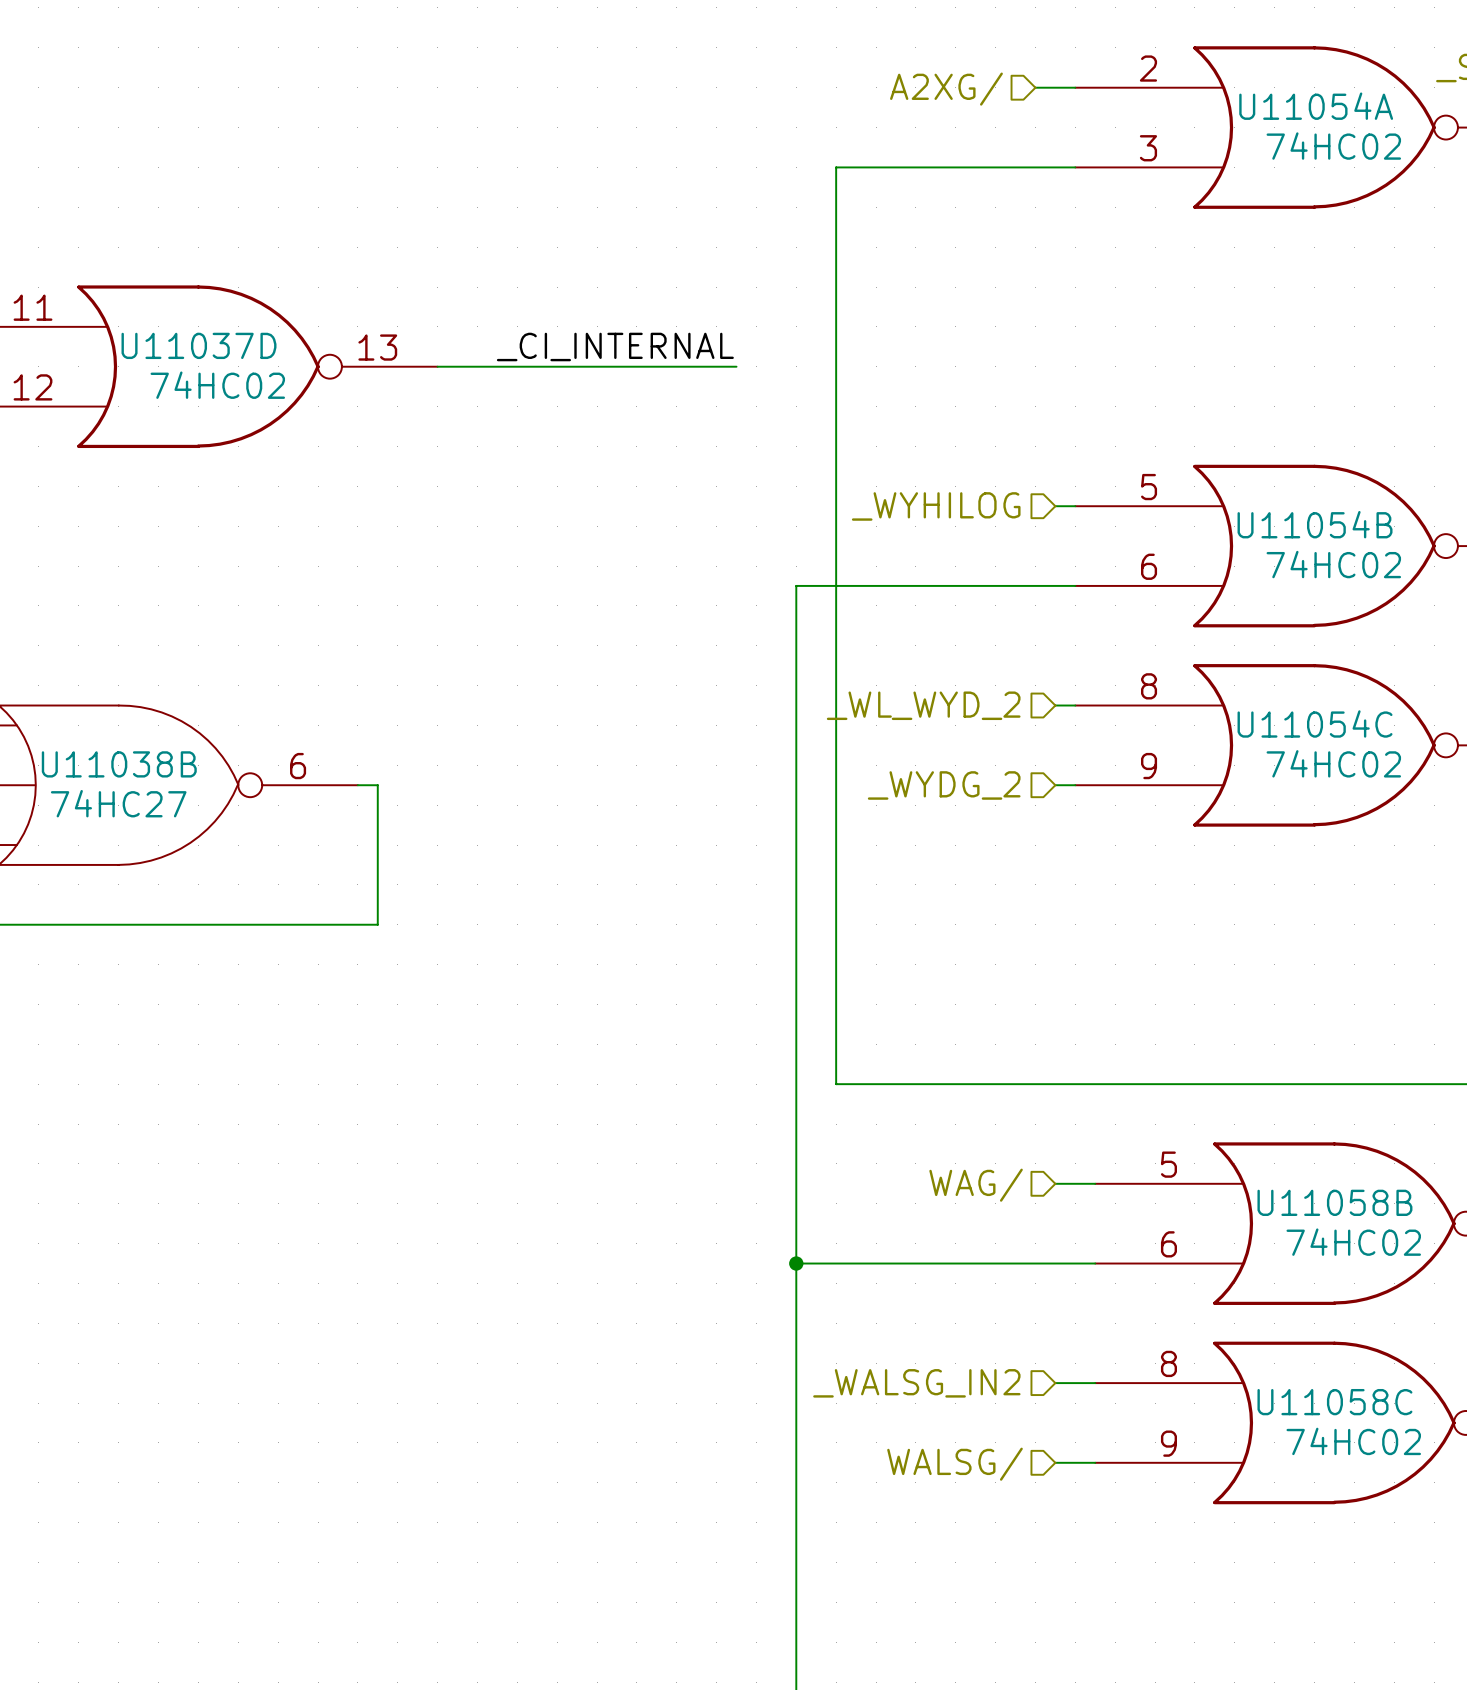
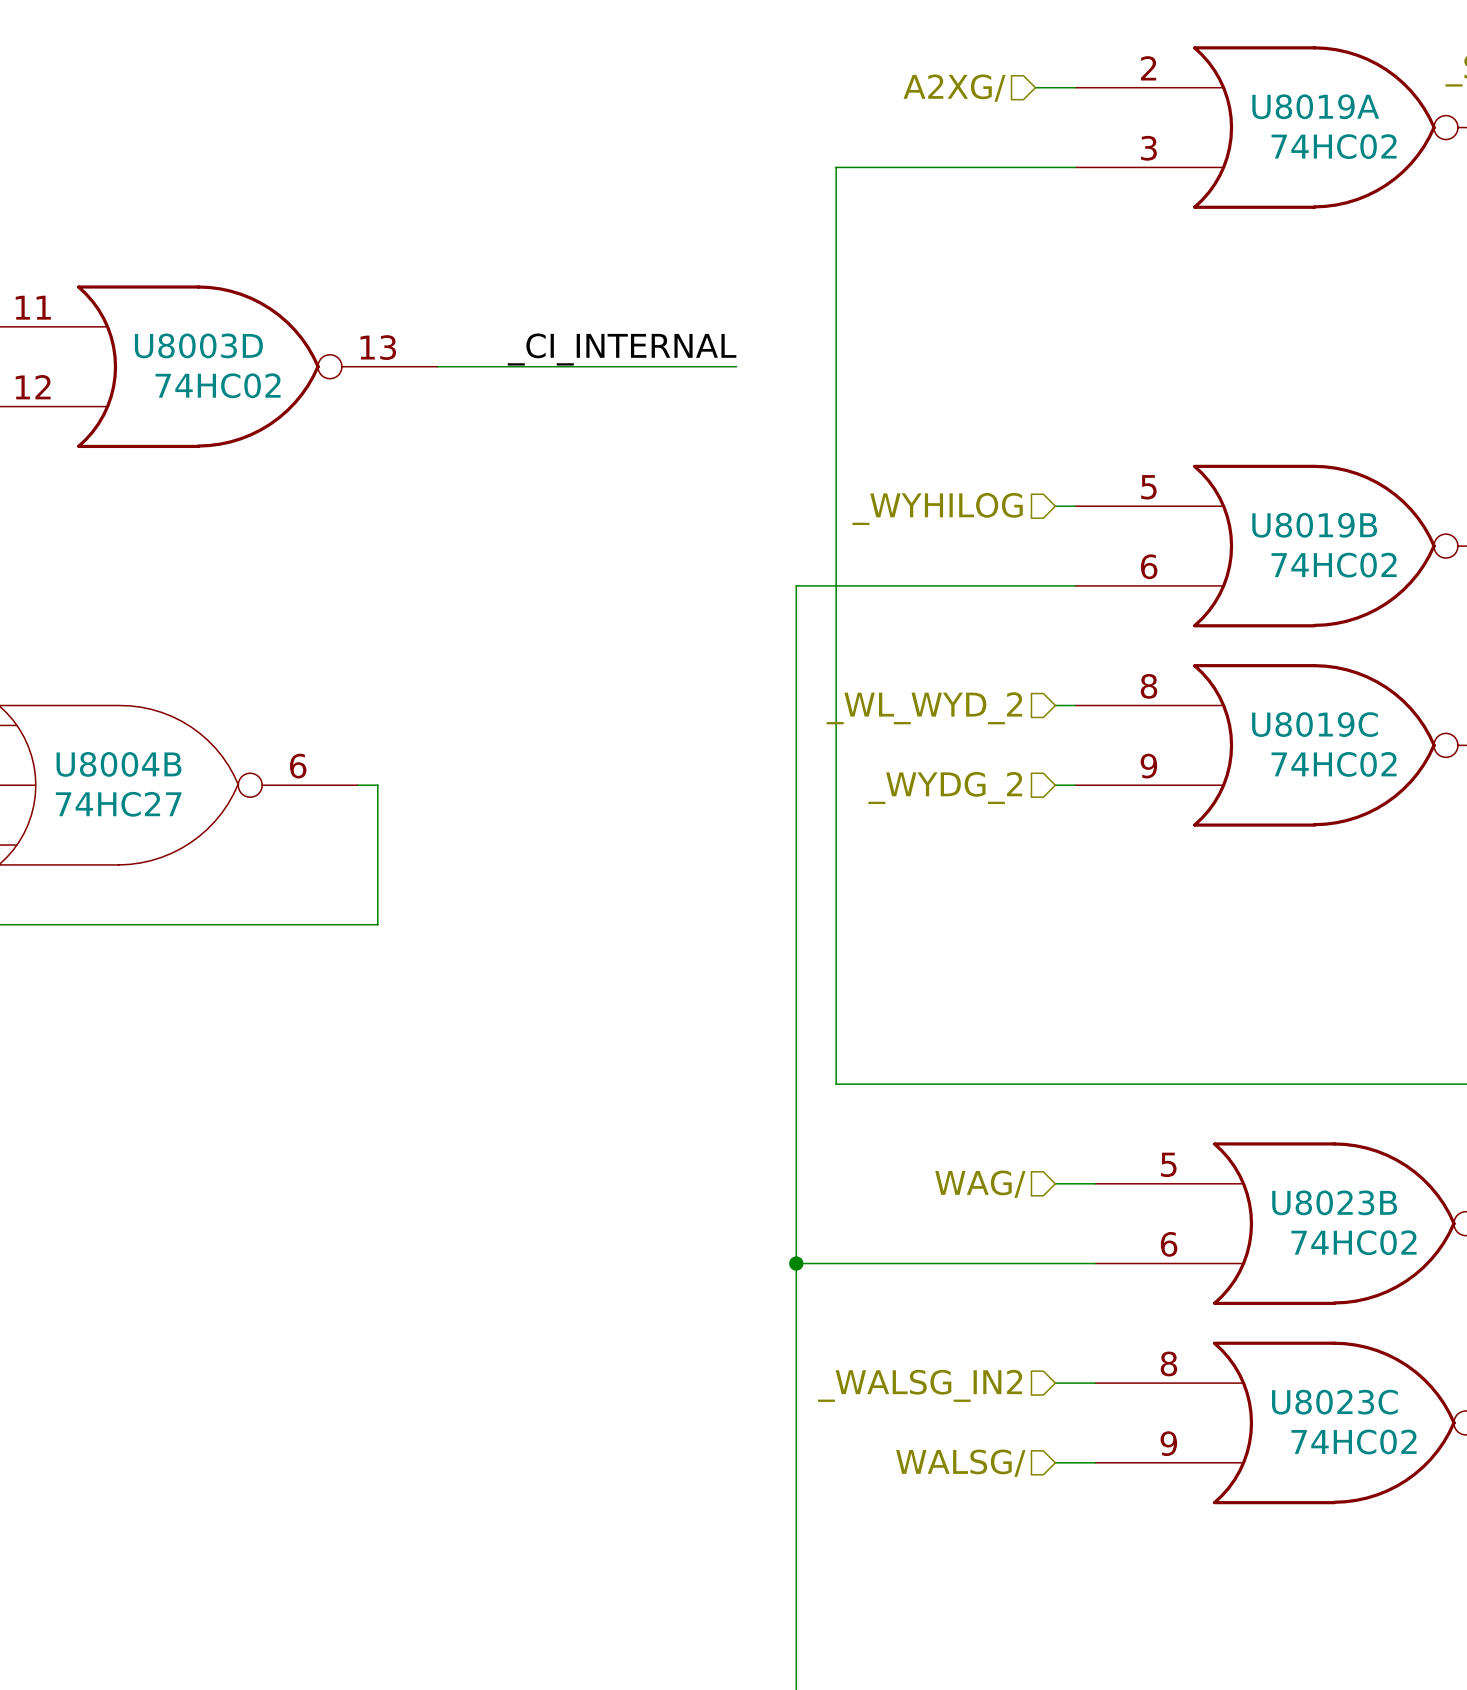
U11054A name: U11054A (1316, 106) -> U8019A (1315, 106)
U11037D name: U11037D (198, 345) -> U8003D (198, 345)
U11054B name: U11054B (1315, 524) -> U8019B (1314, 525)
U11054C name: U11054C (1315, 723) -> U8019C (1314, 724)
U11038B name: U11038B (119, 764) -> U8004B (118, 764)
U11058B name: U11058B (1334, 1202) -> U8023B (1334, 1202)
U11058C name: U11058C (1334, 1402) -> U8023C (1334, 1402)

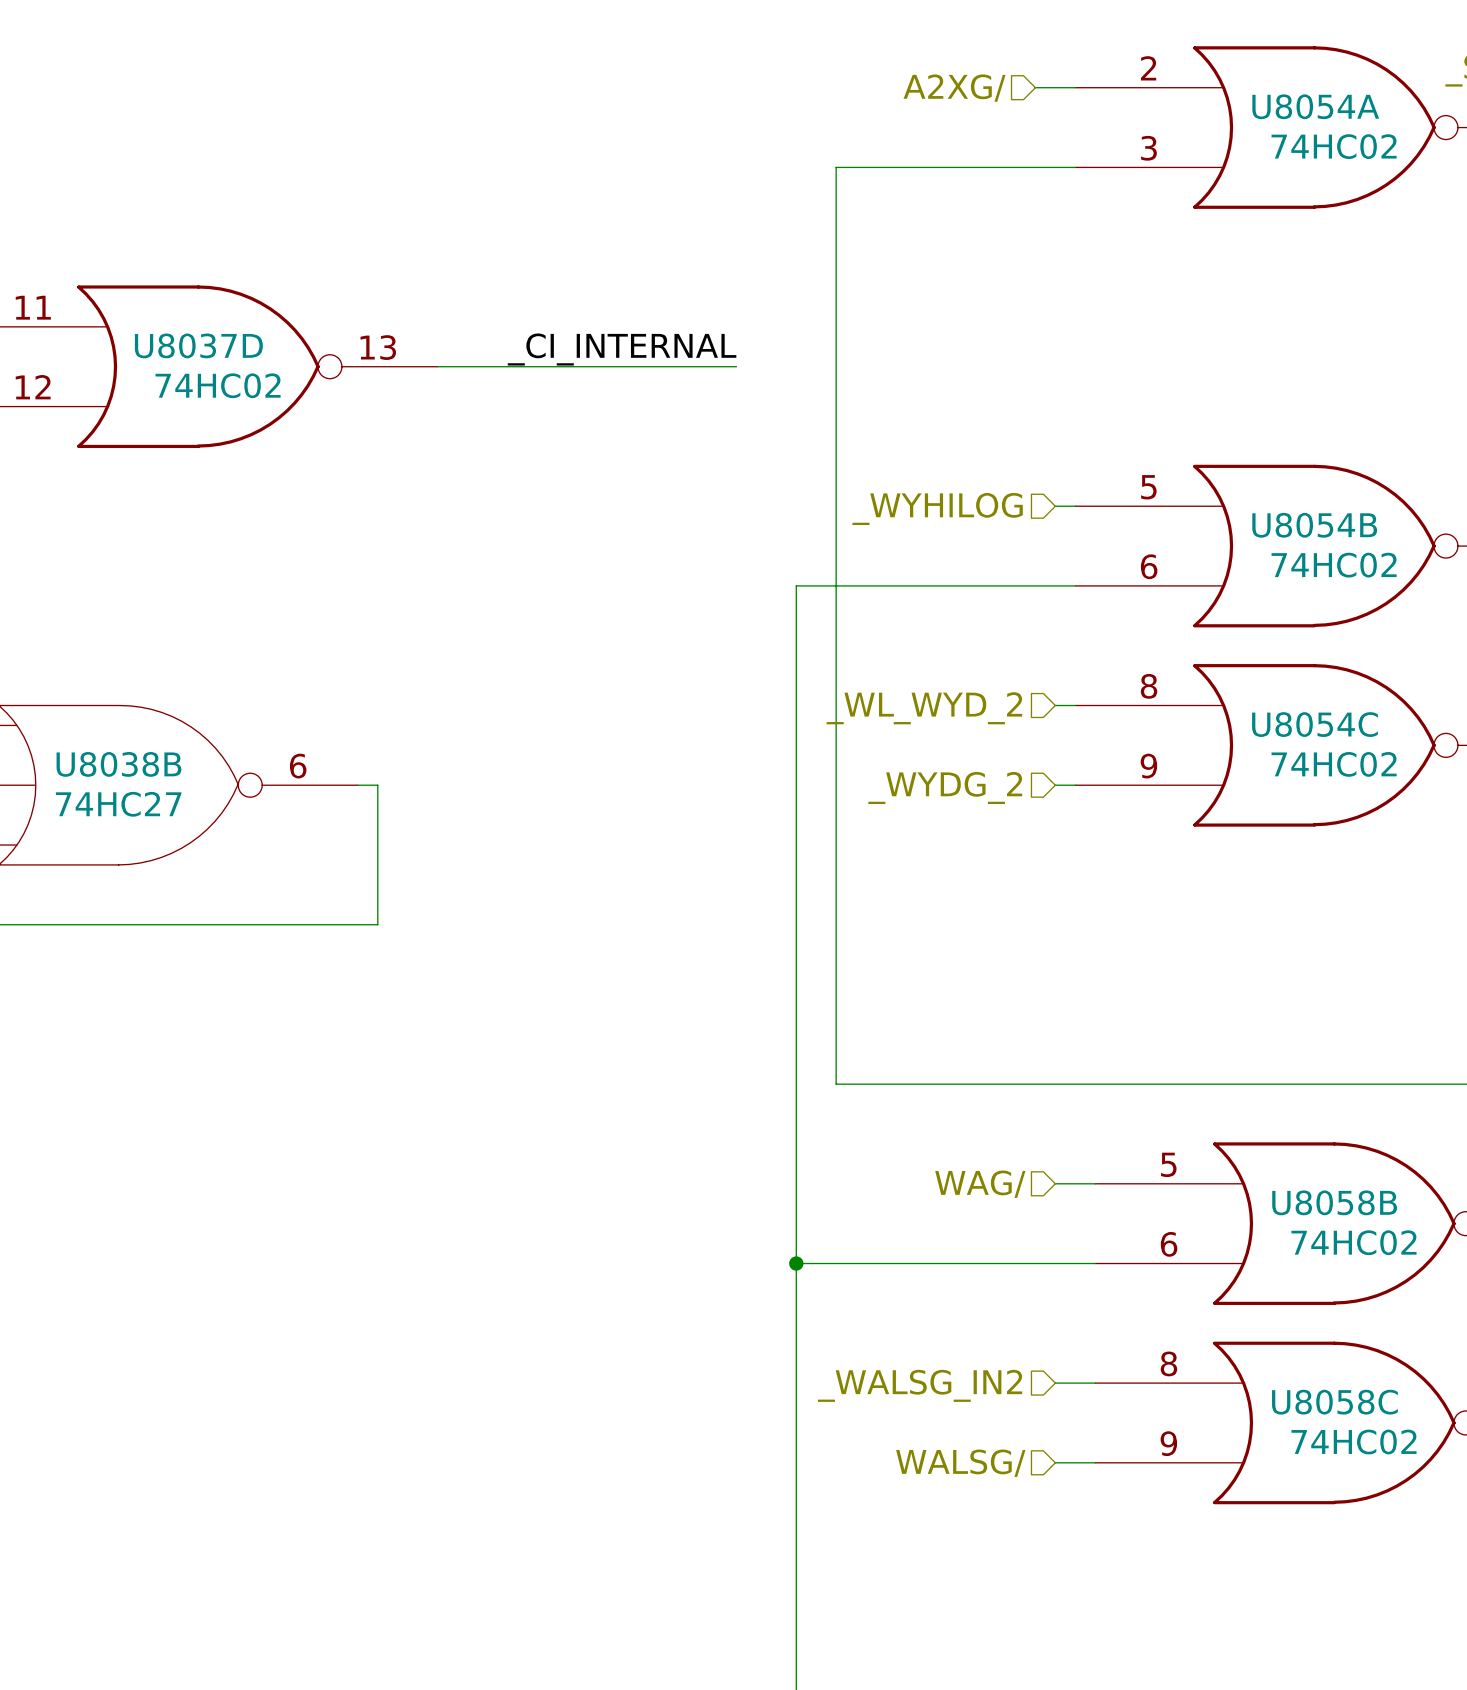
U8019A name: U8019A (1315, 106) -> U8054A (1315, 106)
U8003D name: U8003D (198, 345) -> U8037D (198, 345)
U8019B name: U8019B (1314, 525) -> U8054B (1314, 525)
U8019C name: U8019C (1314, 724) -> U8054C (1314, 724)
U8004B name: U8004B (118, 764) -> U8038B (118, 764)
U8023B name: U8023B (1334, 1202) -> U8058B (1334, 1202)
U8023C name: U8023C (1334, 1402) -> U8058C (1334, 1402)

